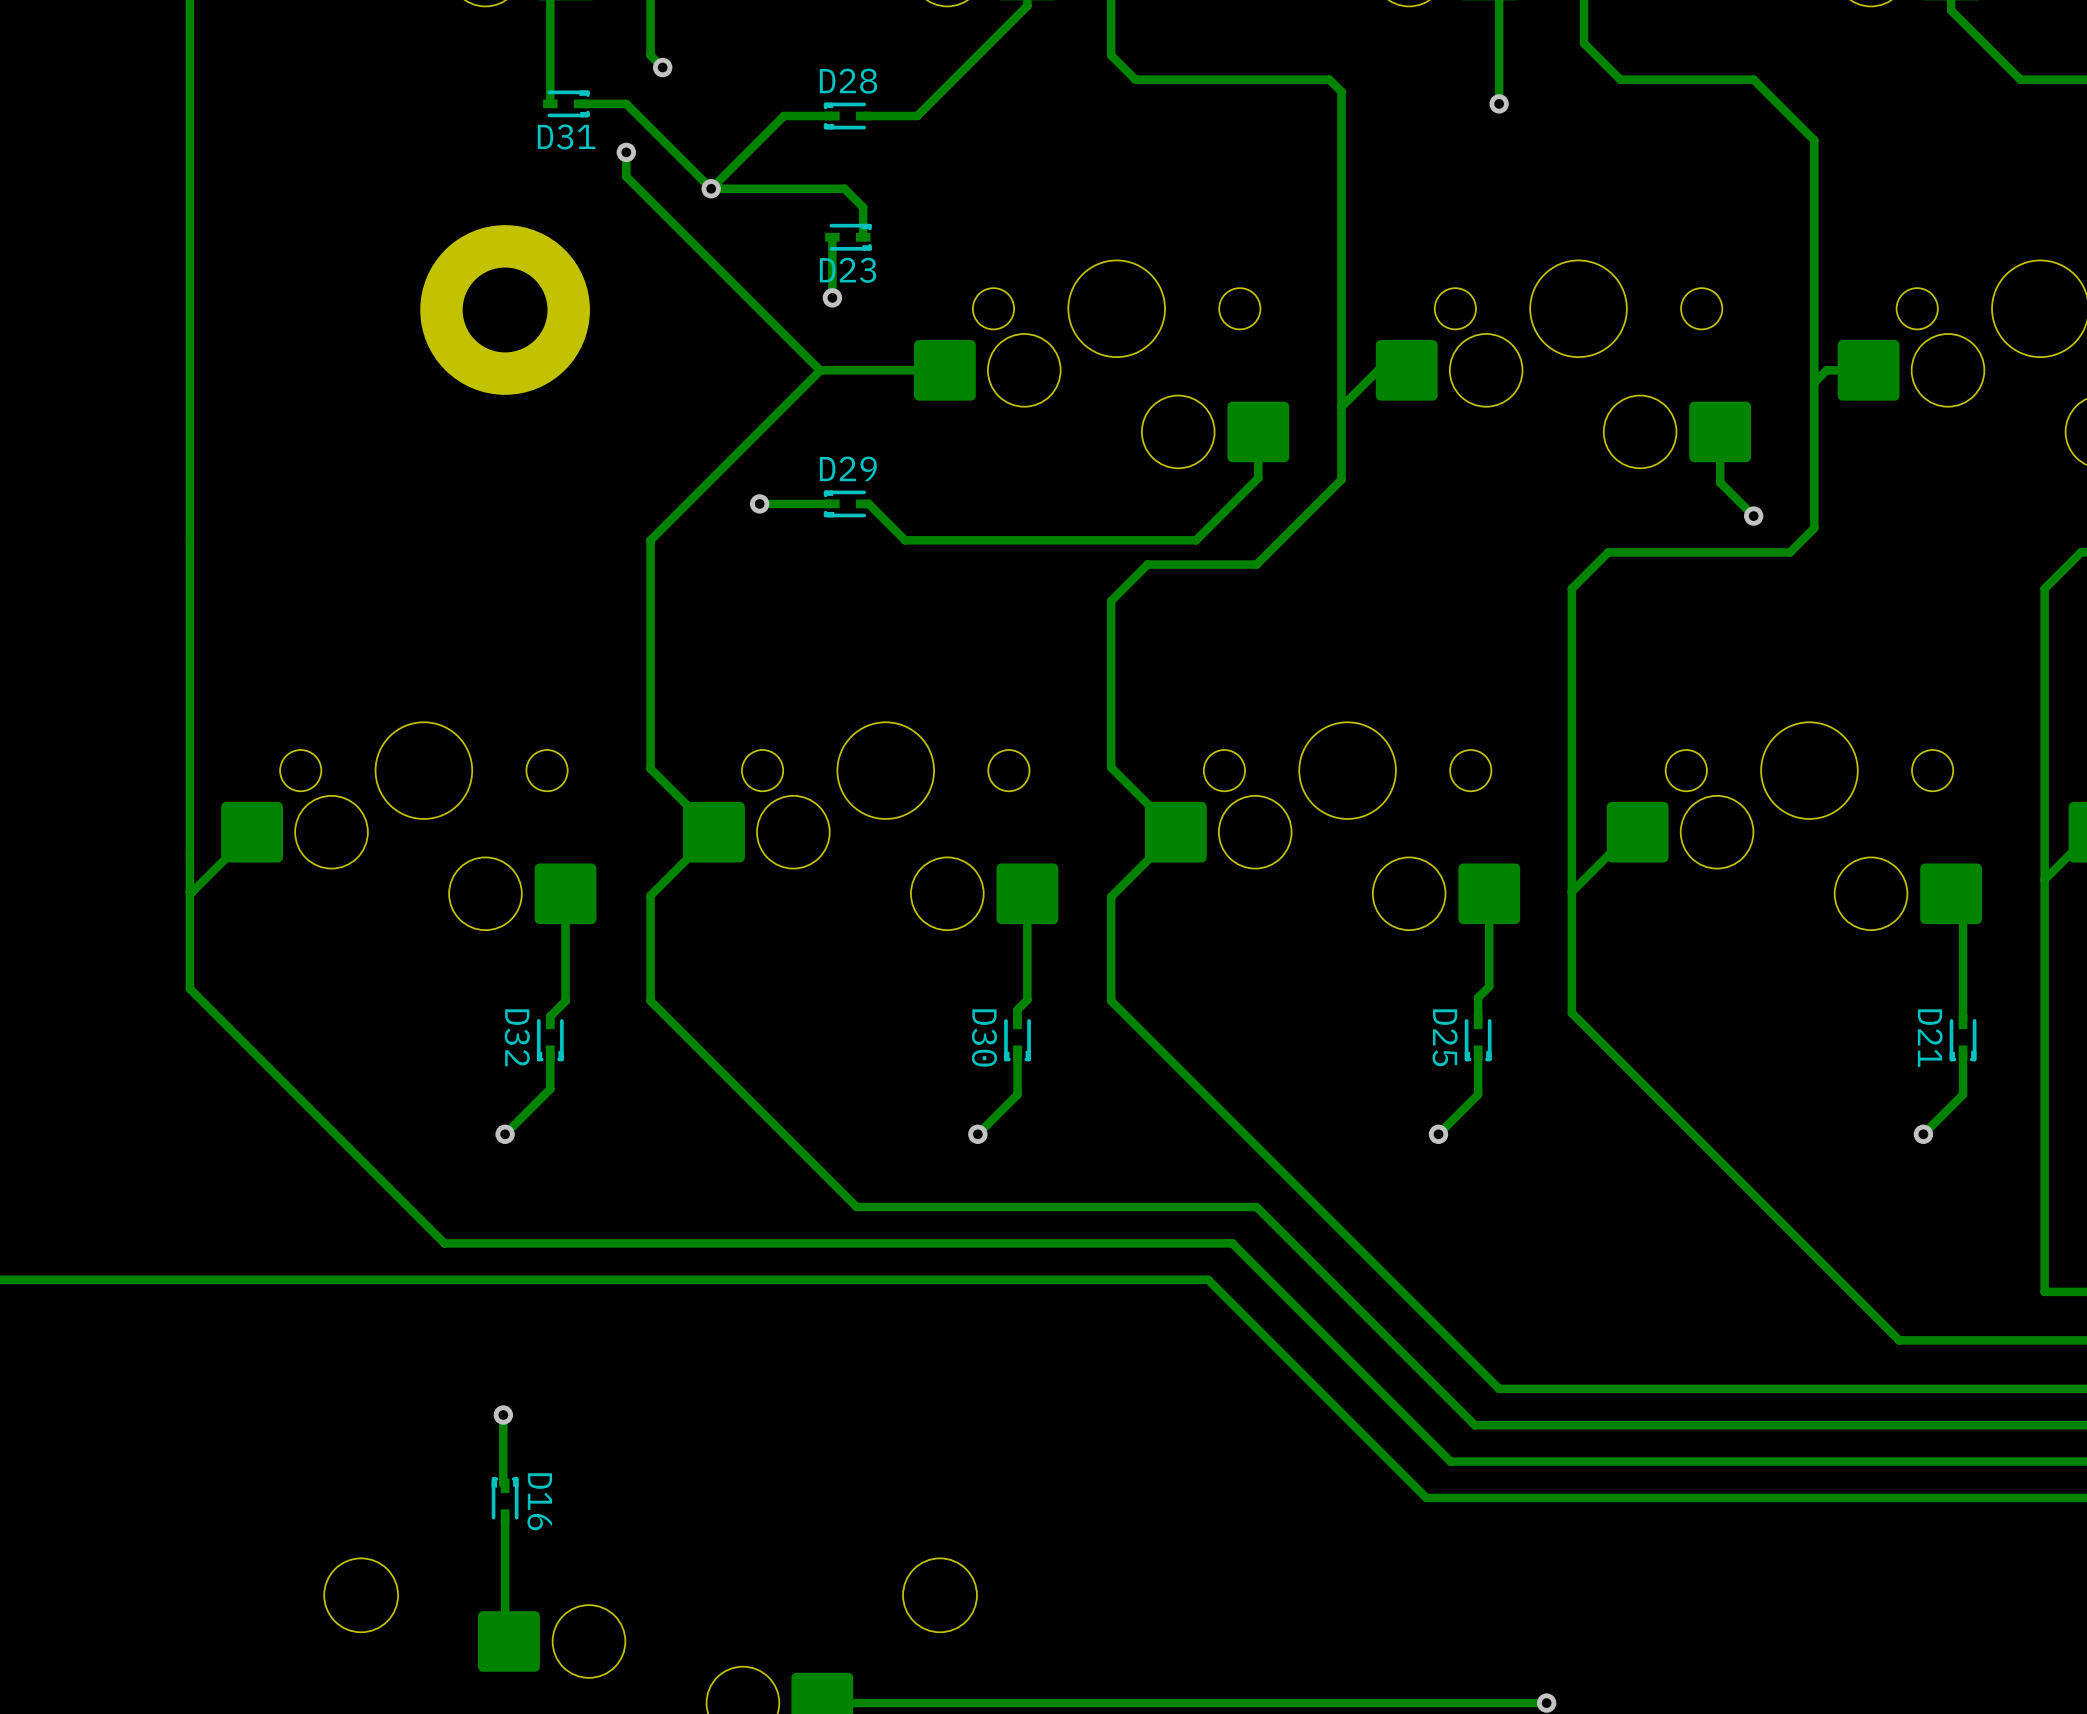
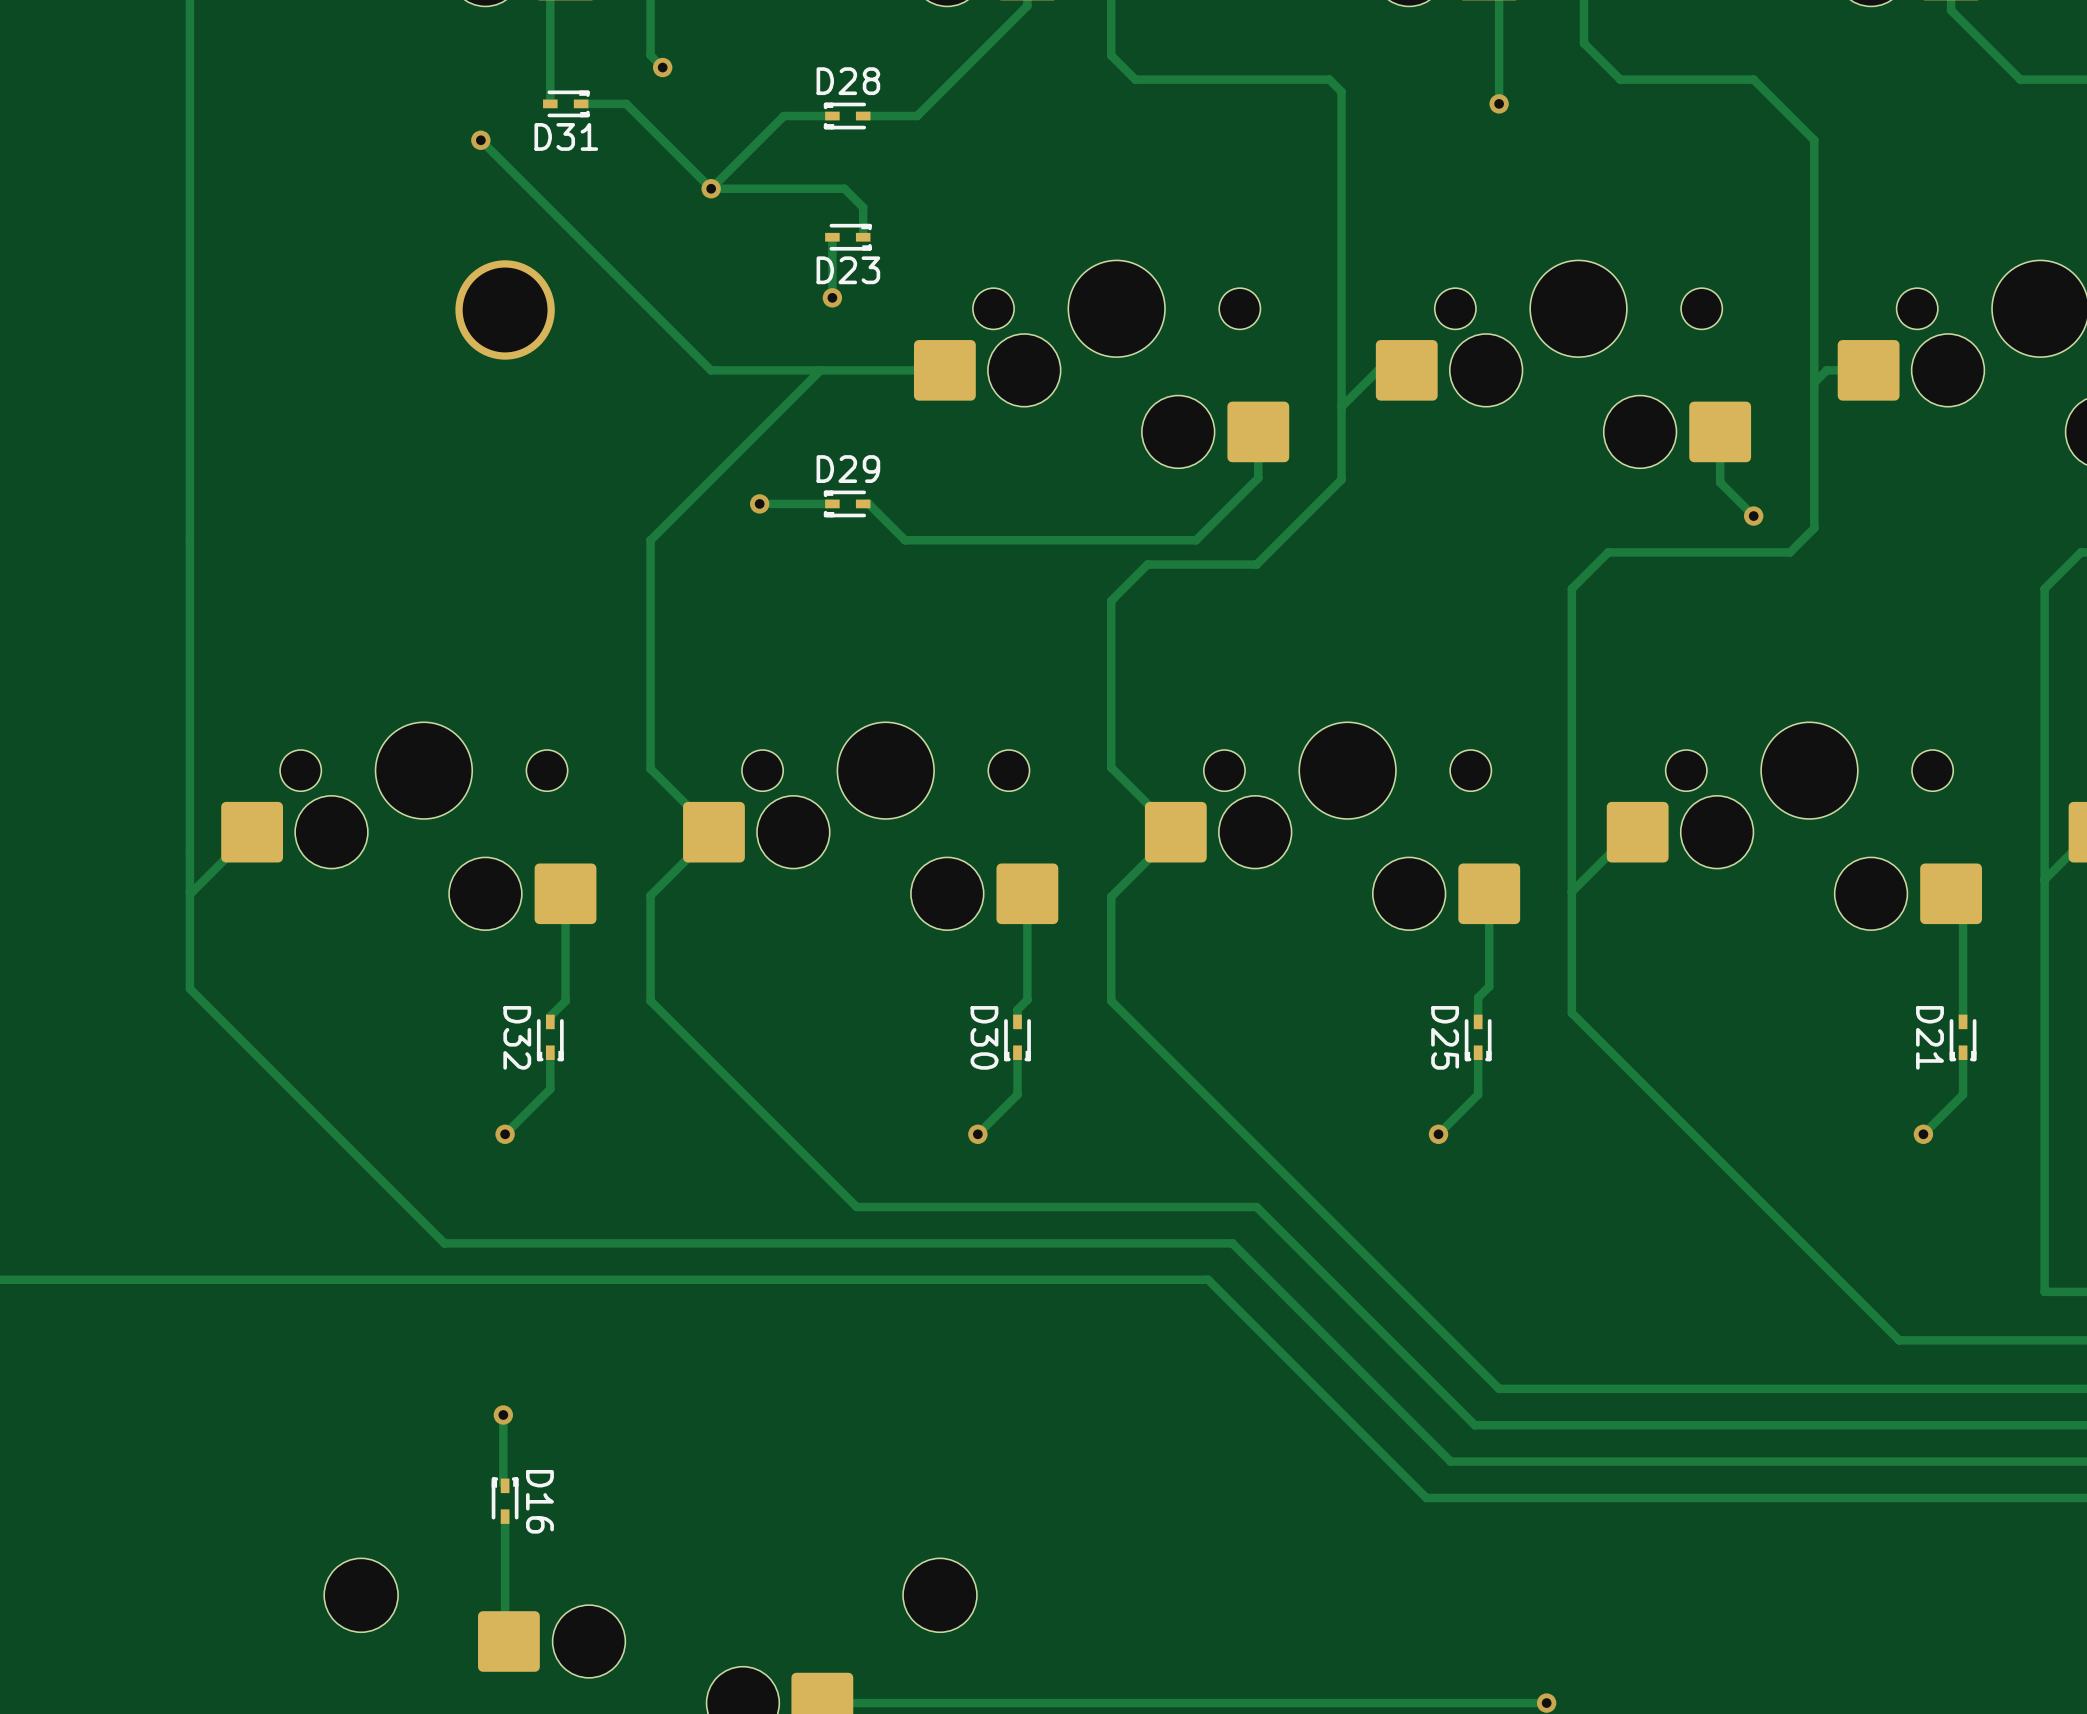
via: none -> (480, 140)
track: (626, 152) (626, 176) (820, 370) -> (480, 140) (710, 370) (820, 370)
via: (626, 152) -> none
part footprint: [420, 225, 590, 395] -> [455, 260, 555, 360]

